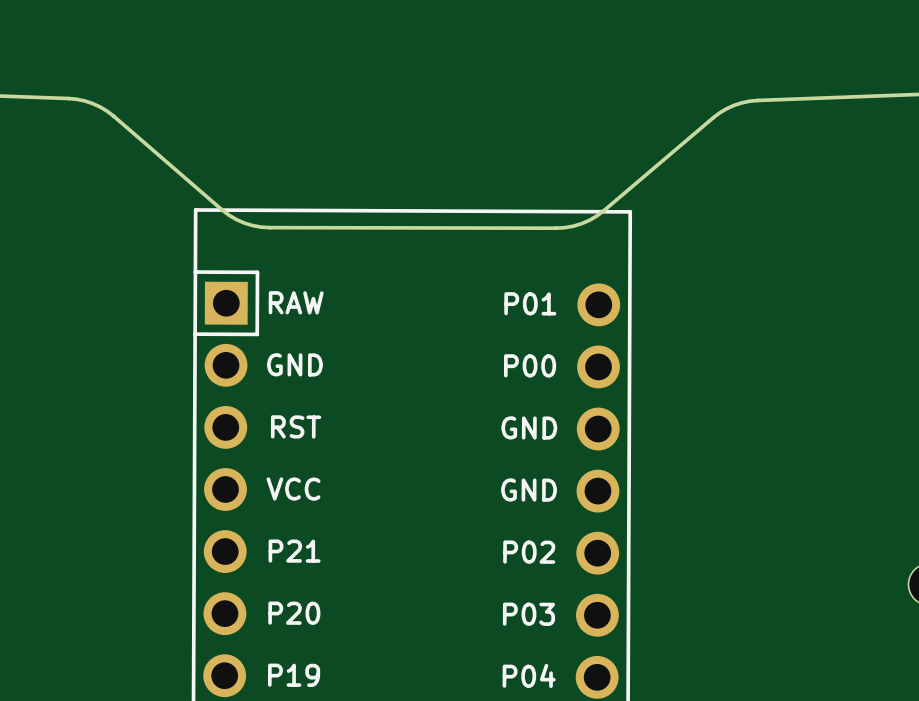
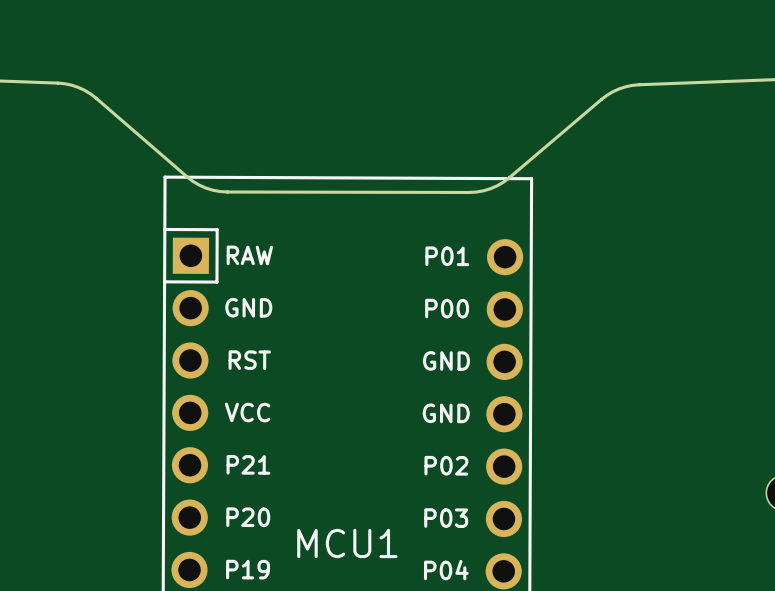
MCU1 name: none -> MCU1 (347, 543)

